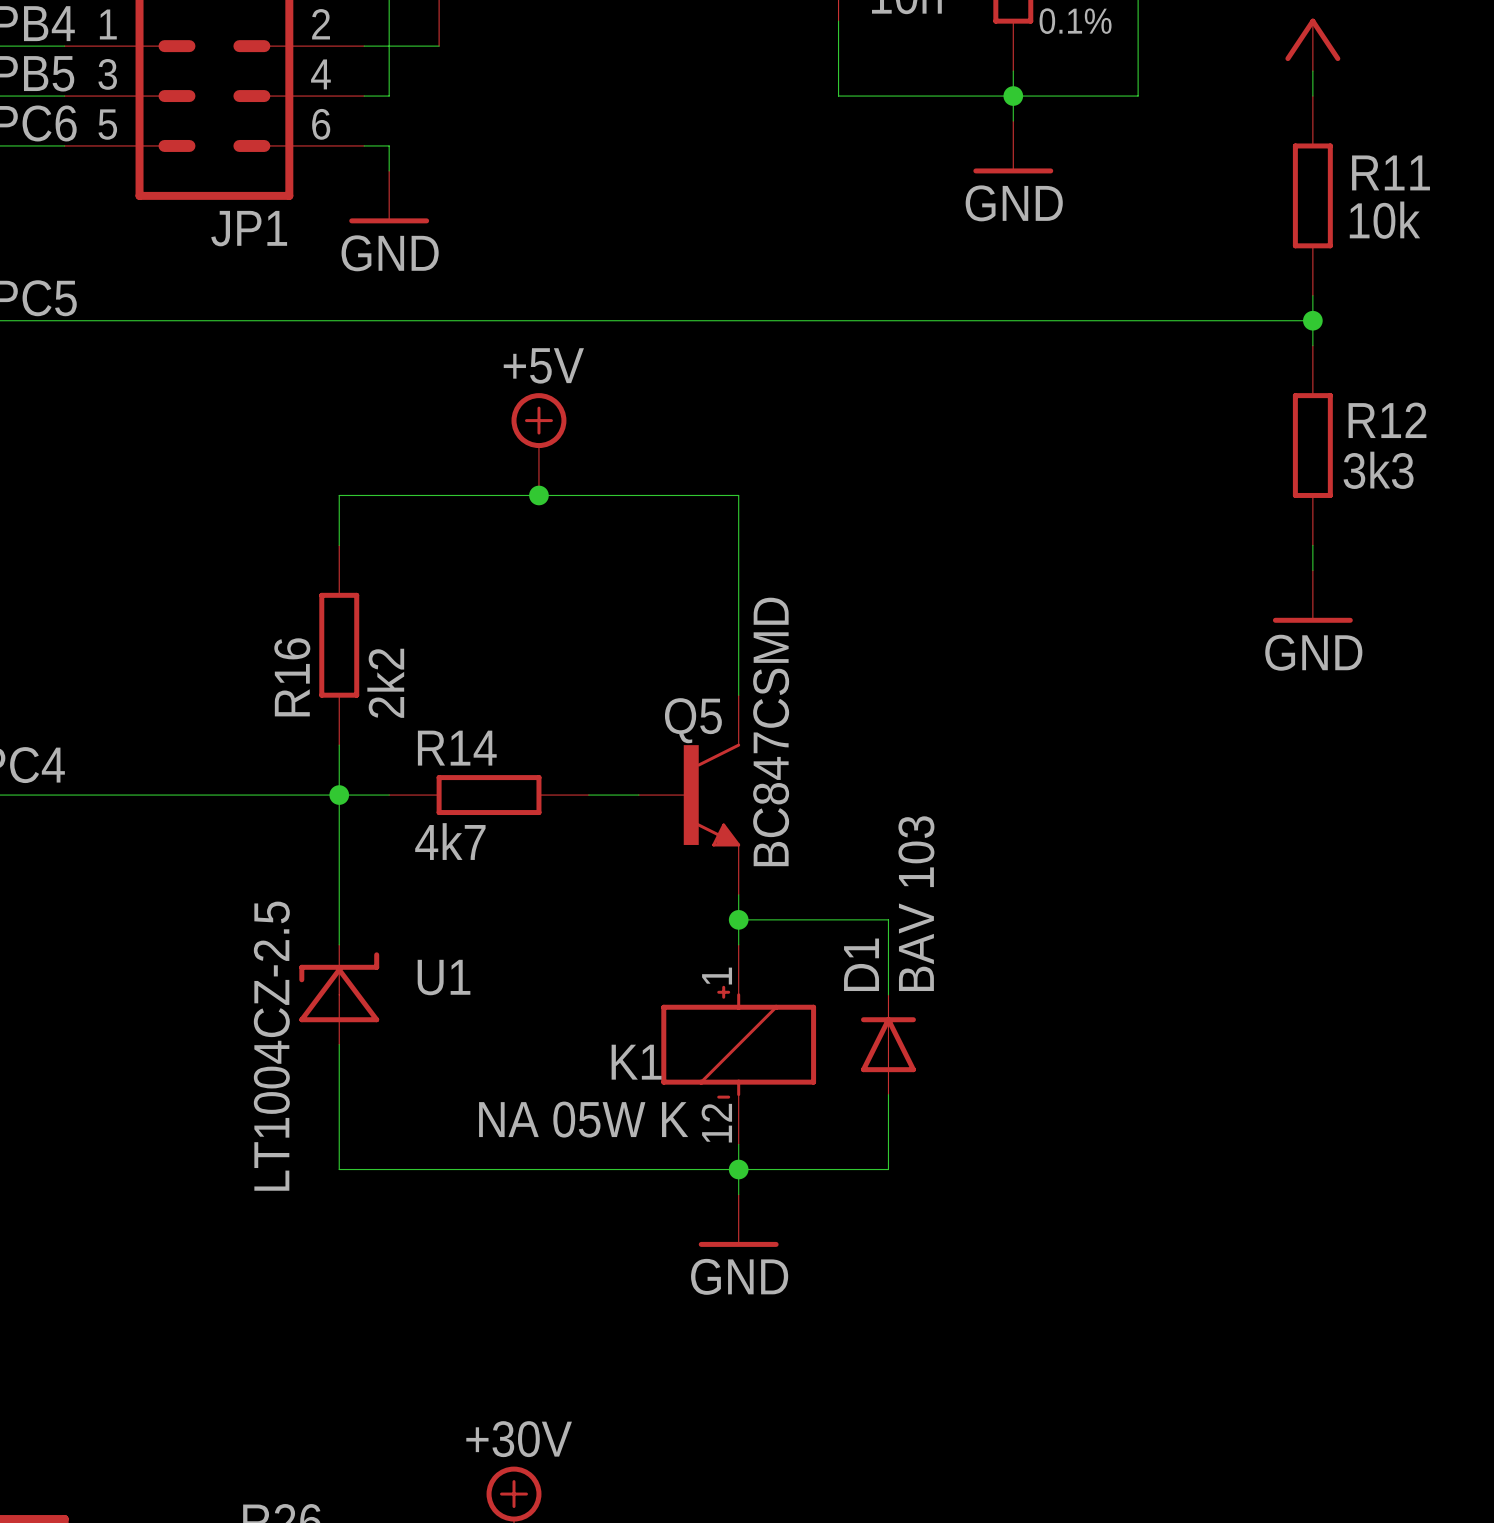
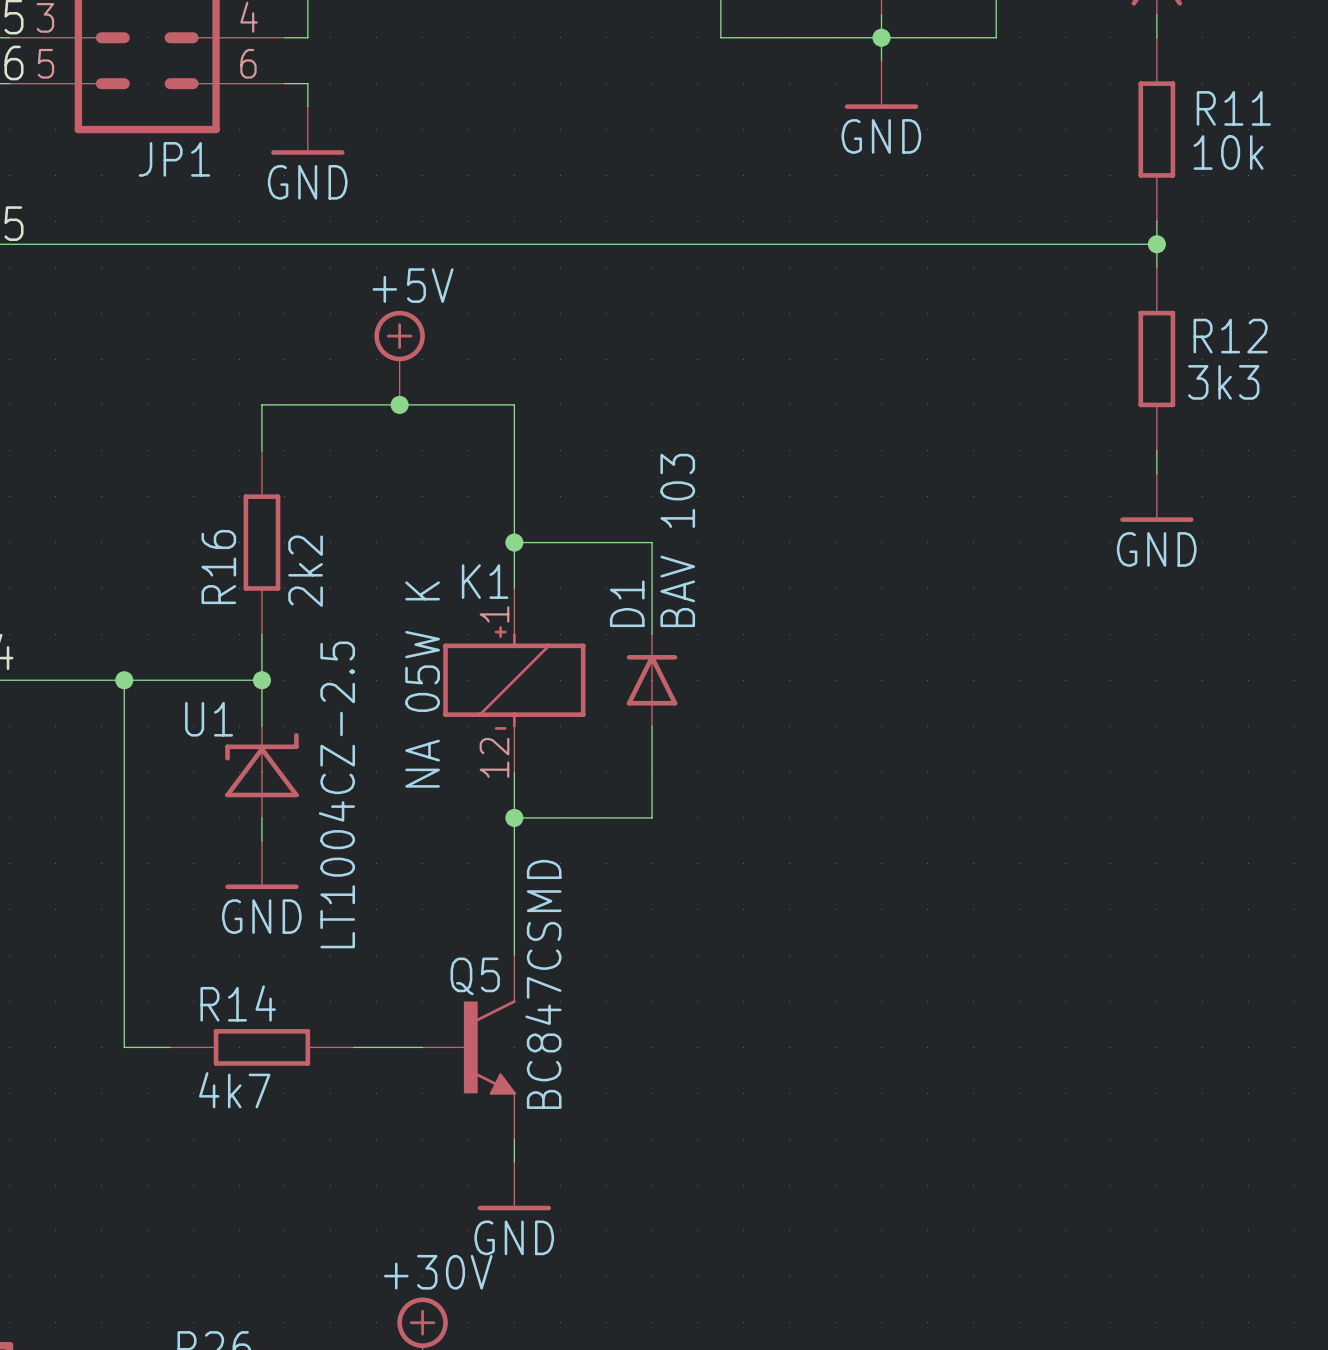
power symbol position: +5V (538, 444) -> +5V (399, 357)
junction position: (538, 495) -> (399, 404)
wire: (613, 495) (738, 495) (738, 695) -> (514, 404) (514, 588)
wire: none -> (514, 542) (652, 542) (652, 634)
junction: none -> (514, 542)
wire: none -> (124, 680) (124, 1047) (170, 1047)
junction: none -> (124, 680)
wire: (339, 795) (389, 795) -> none
R14 position: (489, 795) -> (261, 1047)
wire: (588, 795) (638, 795) -> none
Q5 position: (689, 795) -> (469, 1047)
wire: none -> (652, 726) (652, 817) (514, 817)
wire: none -> (514, 772) (514, 955)
wire: (738, 894) (738, 944) -> none
wire: (738, 919) (888, 919) (888, 994) -> none
junction: (738, 919) -> none
junction: none -> (514, 817)
U1 name position: U1 (444, 977) -> U1 (209, 719)
U1 position: (339, 994) -> (261, 772)
power symbol: none -> GND (261, 864)
wire: (339, 1044) (339, 1169) (888, 1169) (888, 1094) -> none
K1 position: (738, 1044) -> (514, 680)
D1 position: (888, 1044) -> (652, 680)
U1 value position: LT1004CZ-2.5 (271, 1046) -> LT1004CZ-2.5 (336, 794)
K1 name position: K1 (636, 1062) -> K1 (485, 581)
K1 value rotation: 0° (583, 1119) -> 90° counterclockwise (422, 684)
wire: (738, 1144) (738, 1194) -> none
junction: (738, 1169) -> none
wire: none -> (353, 1047) (422, 1047)
power symbol position: GND (738, 1220) -> GND (514, 1186)
wire: none -> (514, 1139) (514, 1162)

